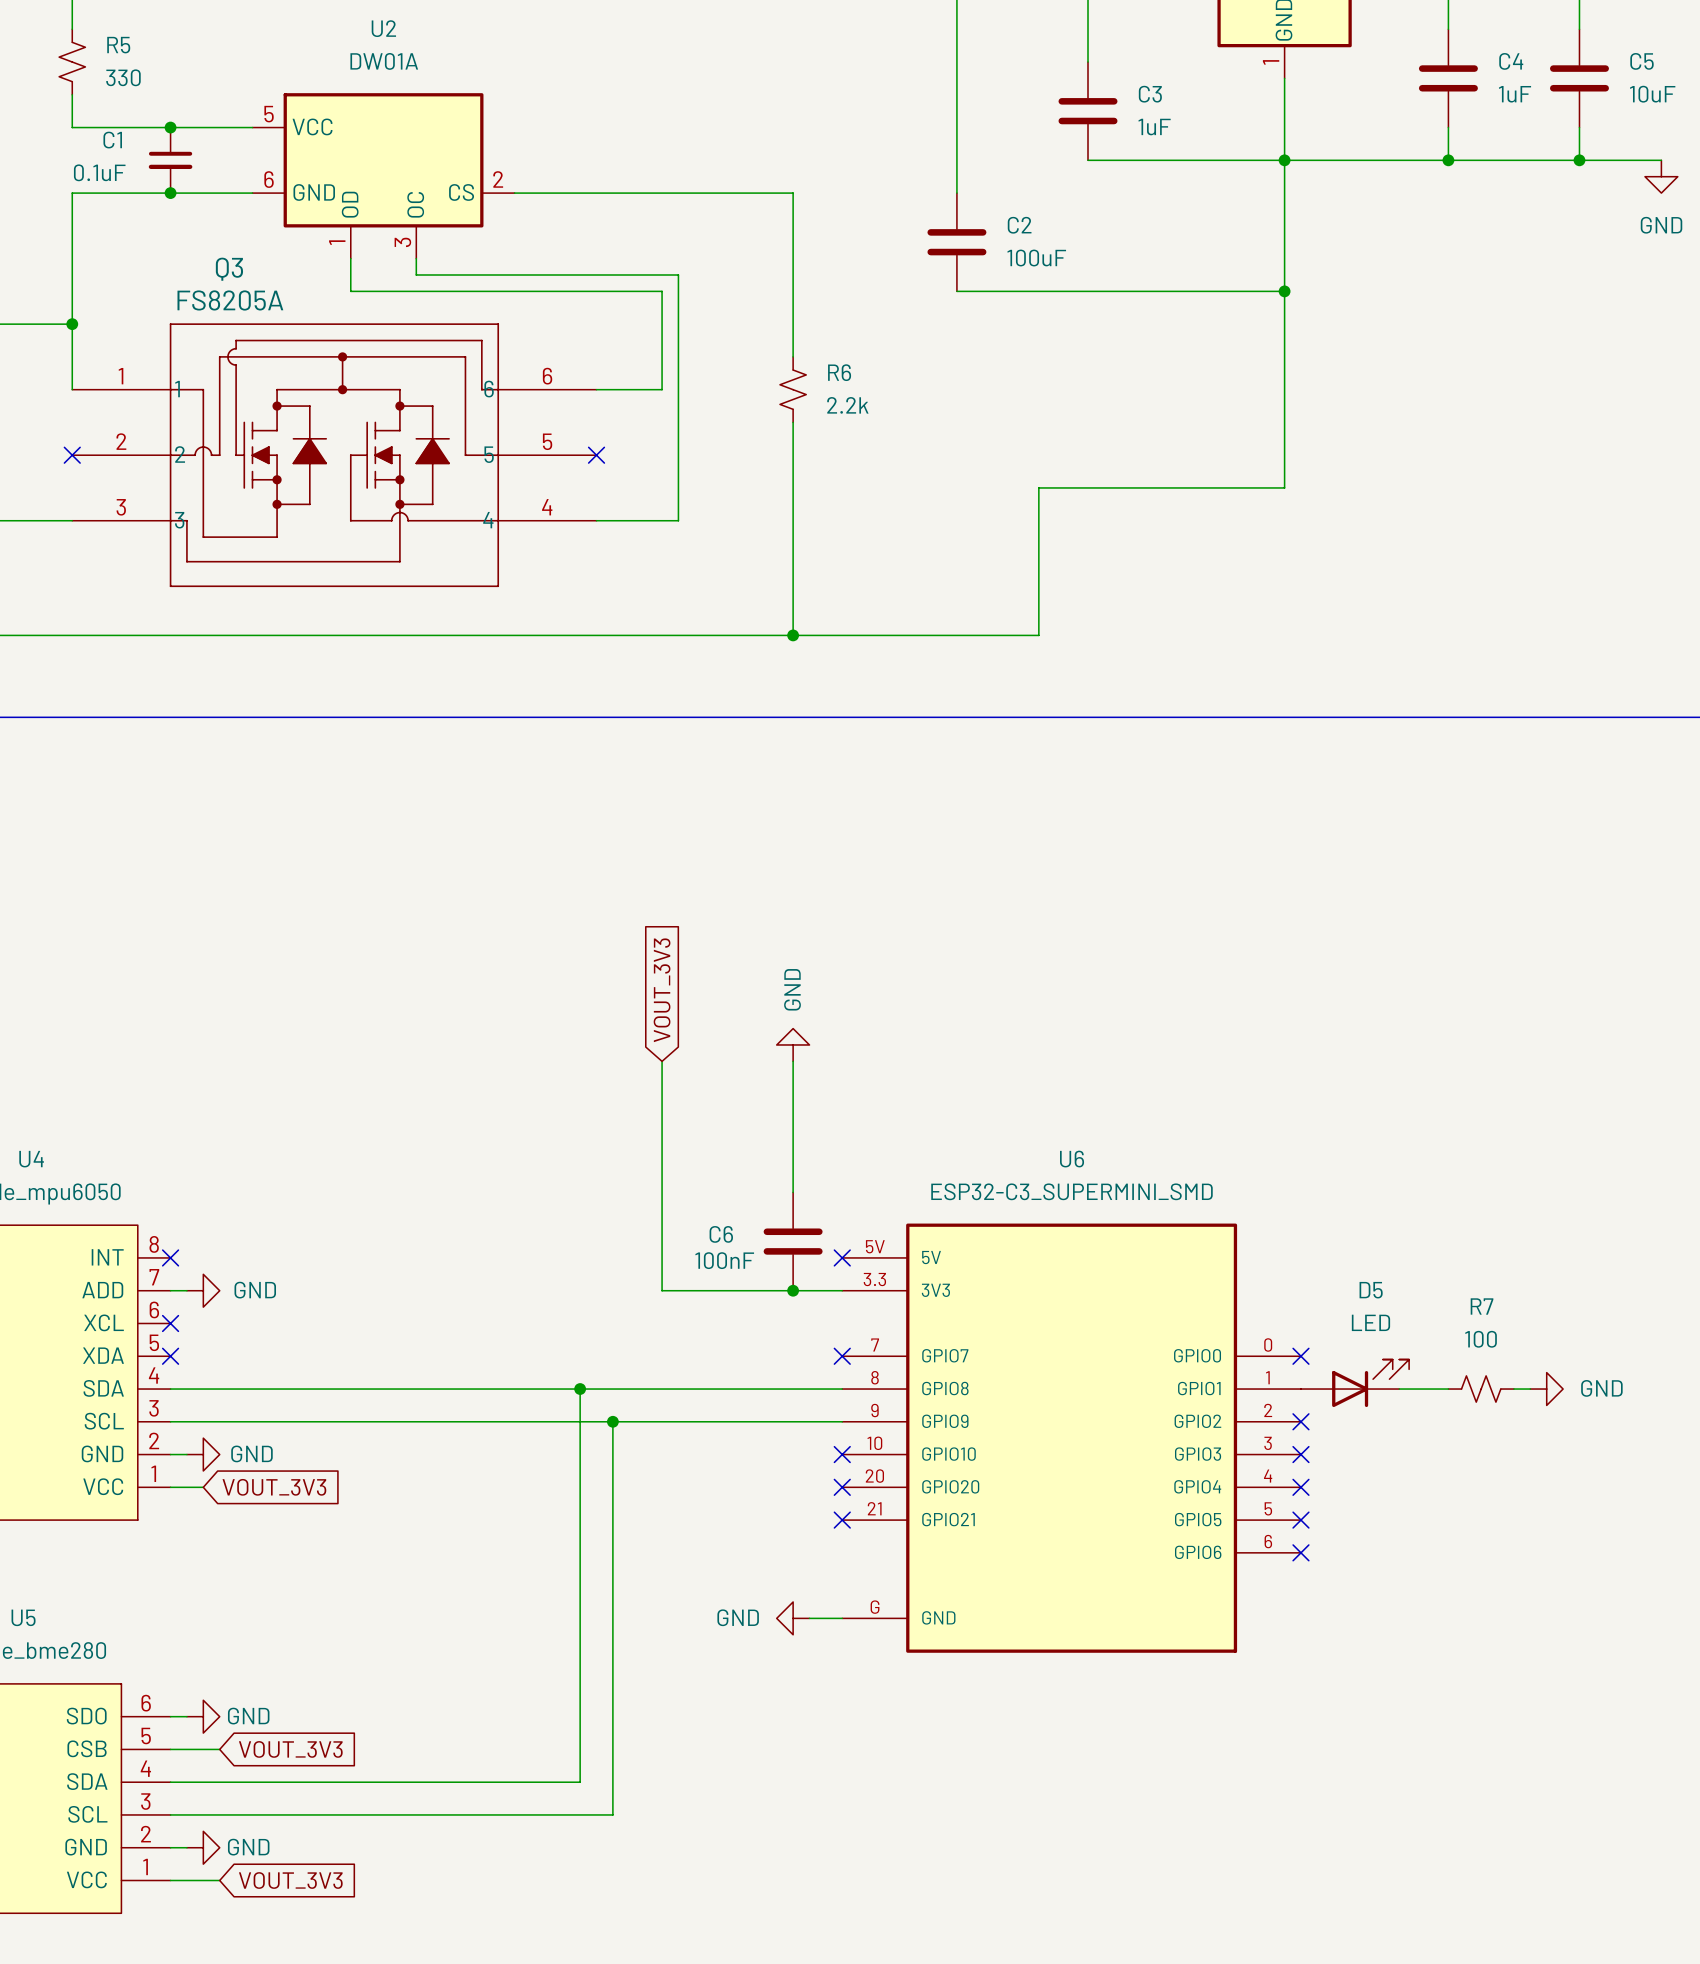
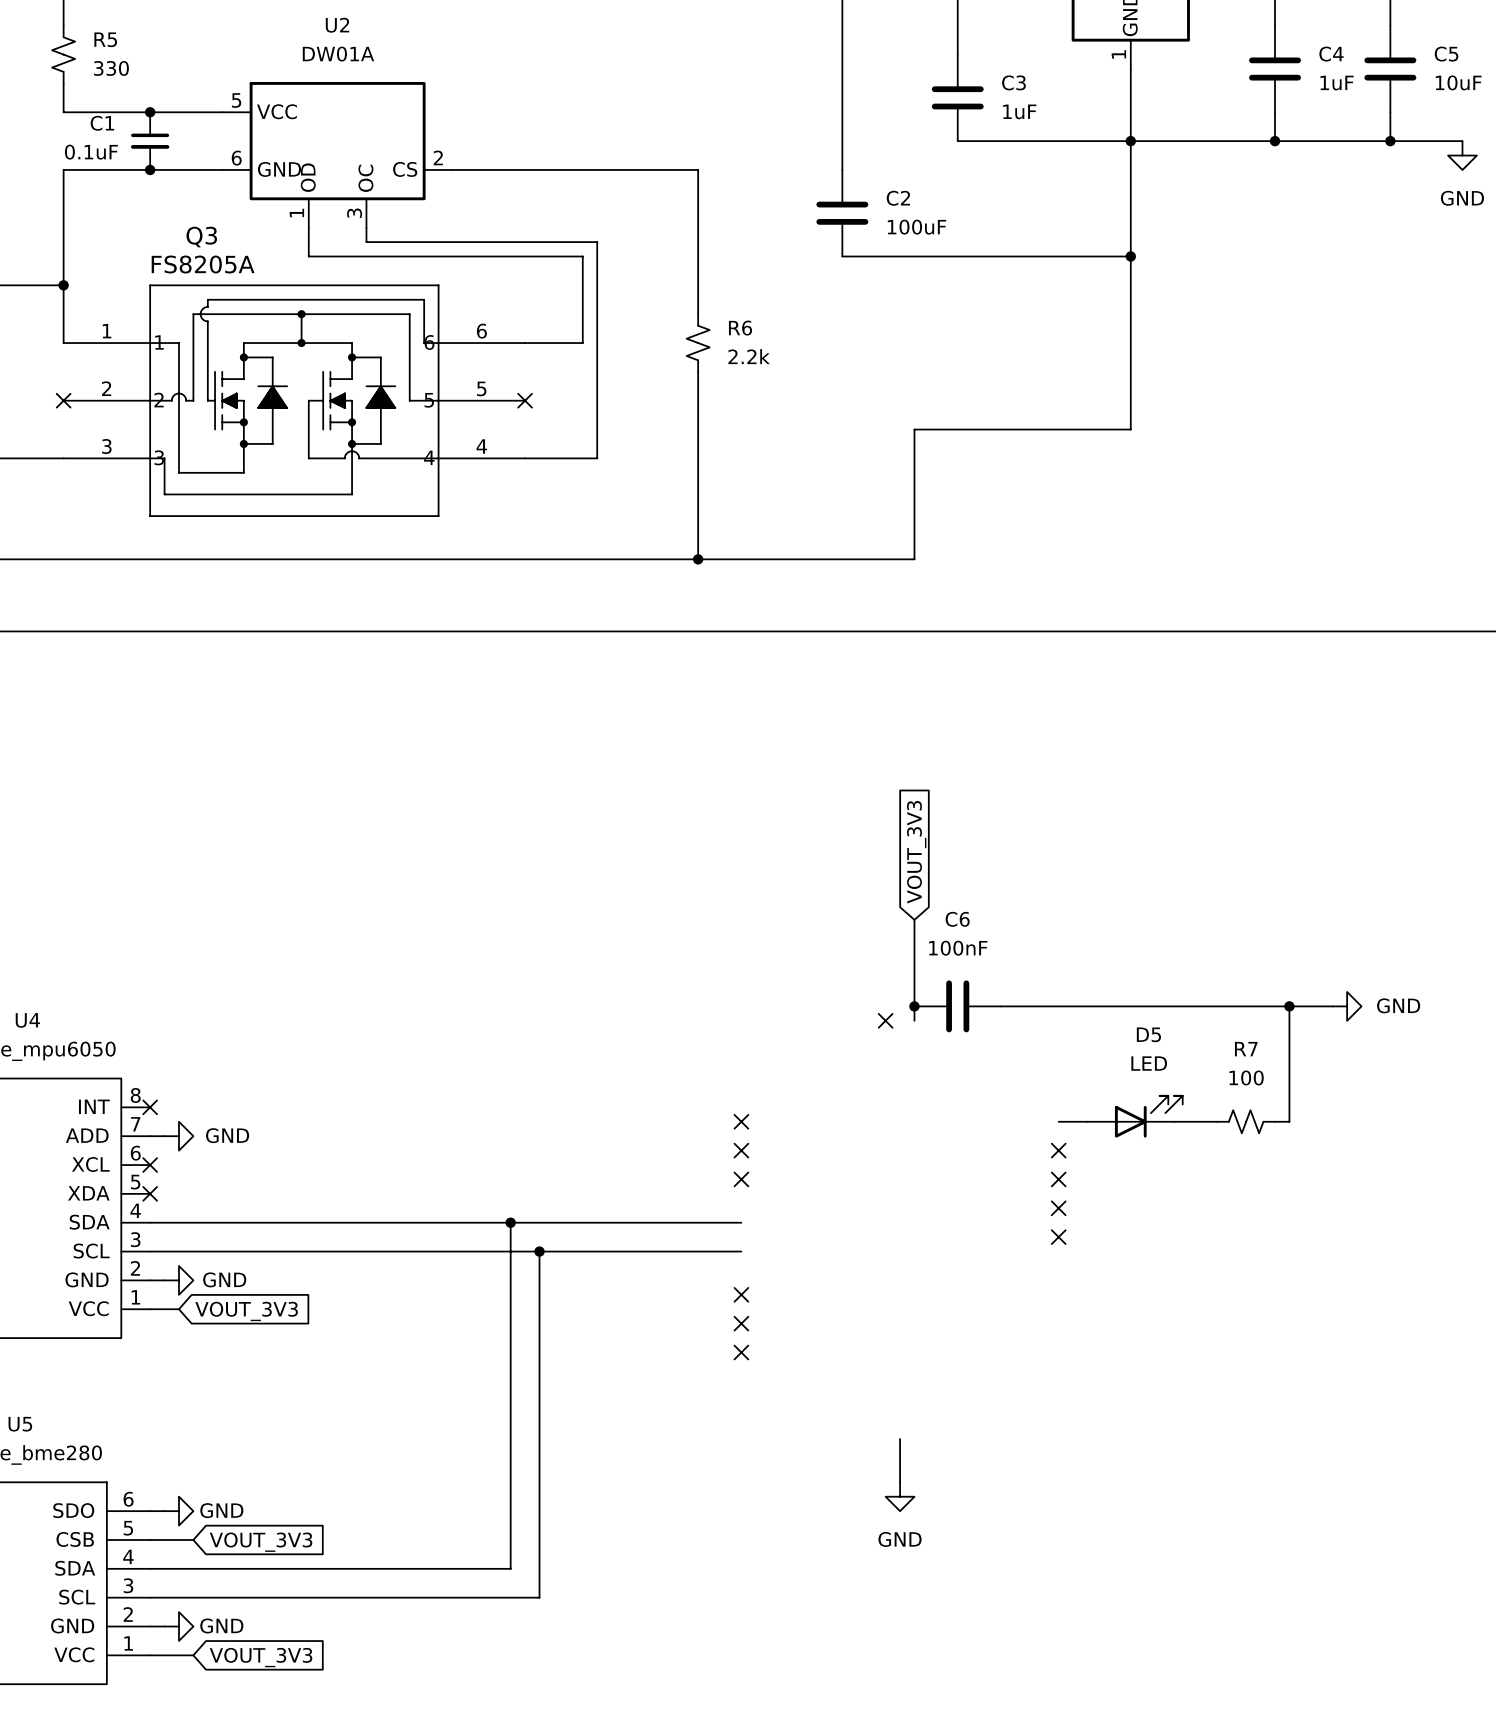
global label: none -> VOUT_3V3 (916, 852)
global label: VOUT_3V3 (662, 990) -> none
power symbol: GND (793, 1044) -> none
wire: none -> (914, 919) (914, 1020)
wire: (662, 1061) (662, 1290) (842, 1290) -> none
wire: (793, 1061) (793, 1192) -> none
junction: none -> (914, 1006)
wire: none -> (1001, 1006) (1332, 1006)
wire: none -> (1289, 1006) (1289, 1121) (1275, 1121)
junction: none -> (1289, 1006)
no-connect mark: none -> (885, 1020)
C6 name position: C6 (721, 1234) -> C6 (957, 919)
C6 rotation: 0° (793, 1241) -> 90° clockwise (957, 1006)
C6 position: (793, 1241) -> (957, 1006)
no-connect mark position: (842, 1257) -> (741, 1121)
junction: (793, 1290) -> none
no-connect mark: none -> (741, 1150)
no-connect mark: none -> (1058, 1150)
no-connect mark: none -> (1058, 1179)
no-connect mark position: (842, 1356) -> (741, 1179)
no-connect mark: (1300, 1356) -> none
no-connect mark: none -> (1058, 1208)
D5 position: (1355, 1383) -> (1135, 1116)
wire: (1399, 1389) (1448, 1389) -> (1174, 1121) (1217, 1121)
R7 position: (1481, 1389) -> (1246, 1121)
wire: (1513, 1389) (1530, 1389) -> none
power symbol position: GND (1546, 1389) -> GND (1347, 1006)
no-connect mark: none -> (1058, 1237)
no-connect mark: (1300, 1421) -> none
U6: ESP32-C3_SUPERMINI_SMD (1071, 1438) -> none
no-connect mark: (842, 1454) -> none
no-connect mark: (1300, 1454) -> none
no-connect mark: none -> (741, 1294)
no-connect mark: (842, 1487) -> none
no-connect mark: (1300, 1487) -> none
no-connect mark: none -> (741, 1323)
no-connect mark: (842, 1520) -> none
no-connect mark: (1300, 1520) -> none
no-connect mark: none -> (741, 1352)
no-connect mark: (1300, 1552) -> none
power symbol rotation: 0° (793, 1618) -> 90° counterclockwise (900, 1496)
power symbol position: GND (793, 1618) -> GND (900, 1496)
wire: (809, 1618) (842, 1618) -> none
wire: none -> (900, 1439) (900, 1482)

